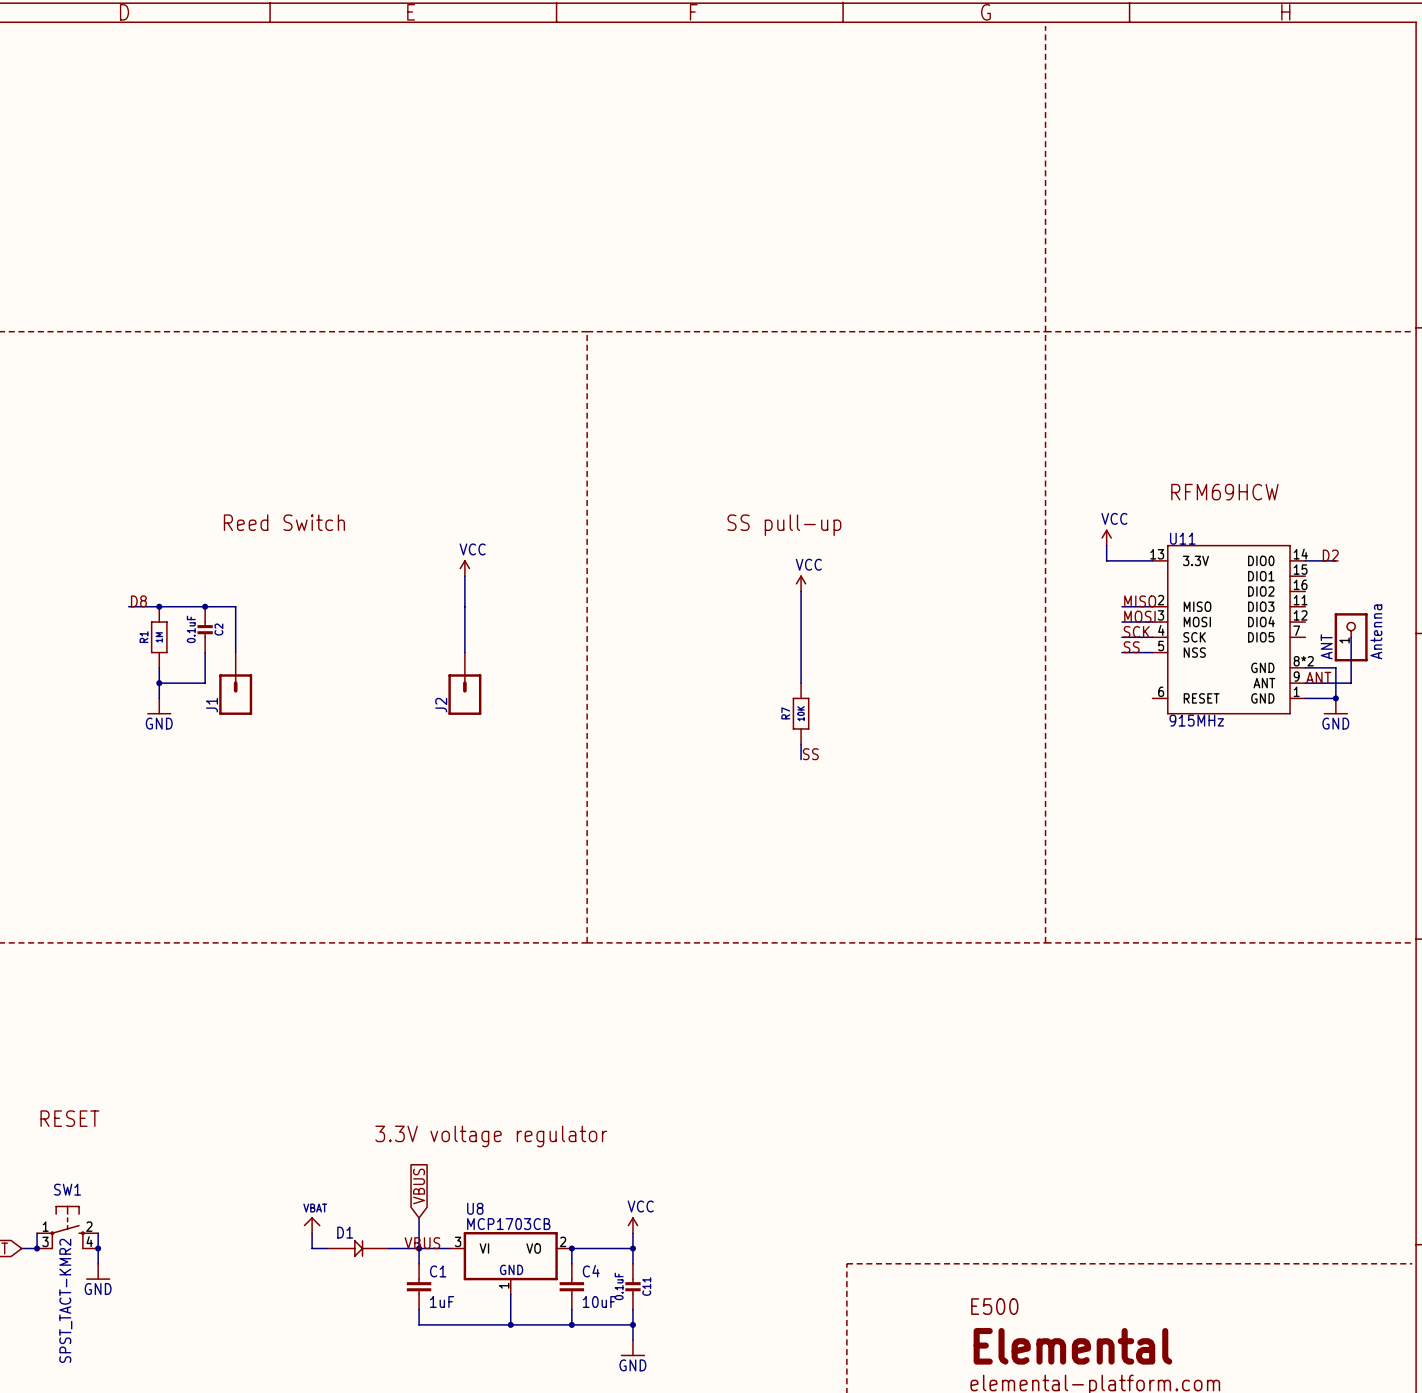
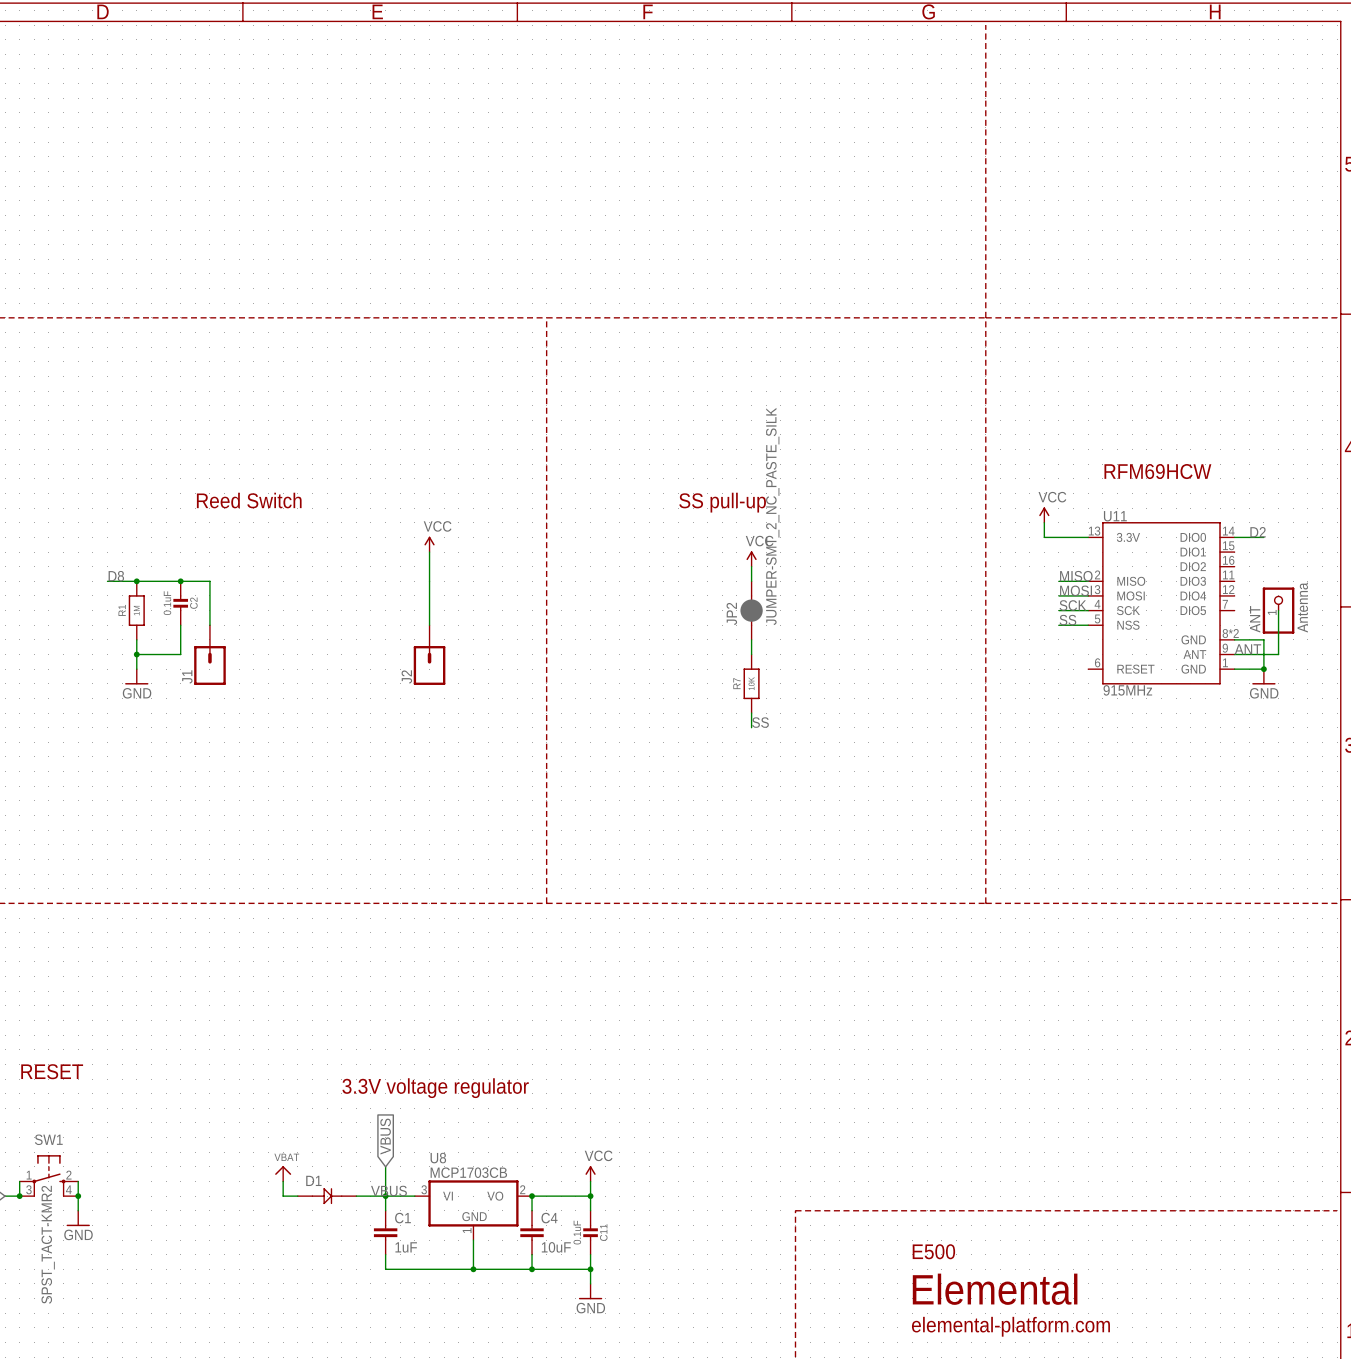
JP2: none -> JUMPER-SMT_2_NC_PASTE_SILK (751, 610)

